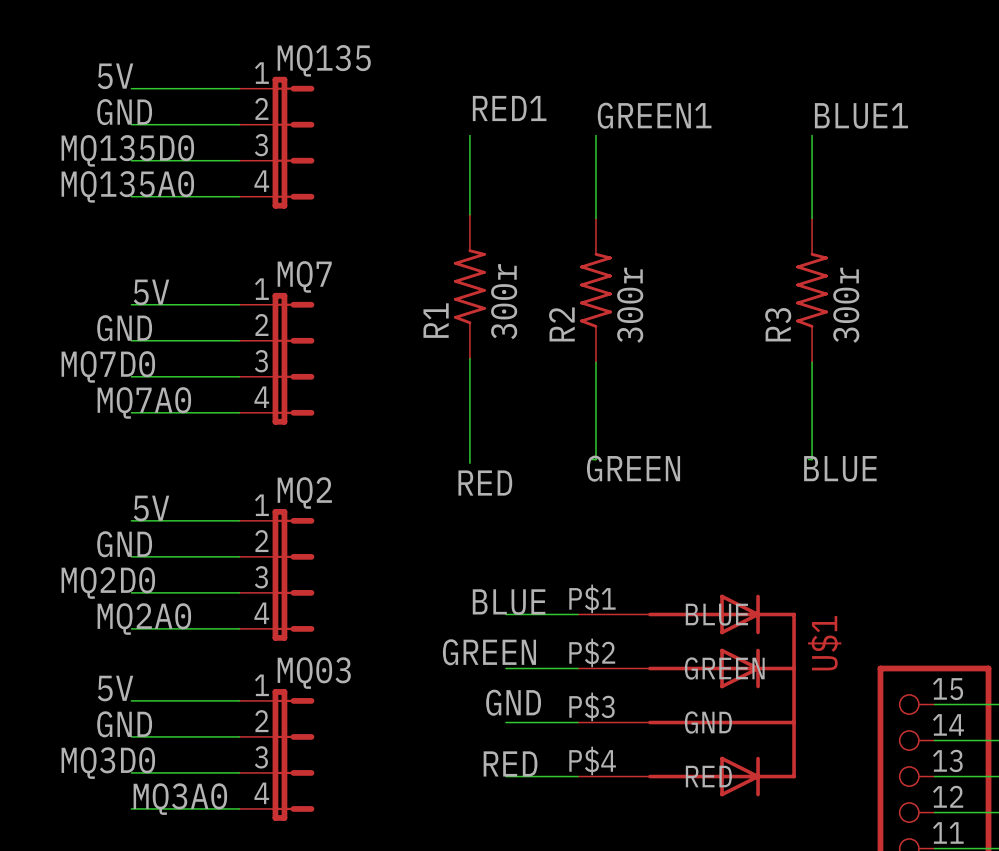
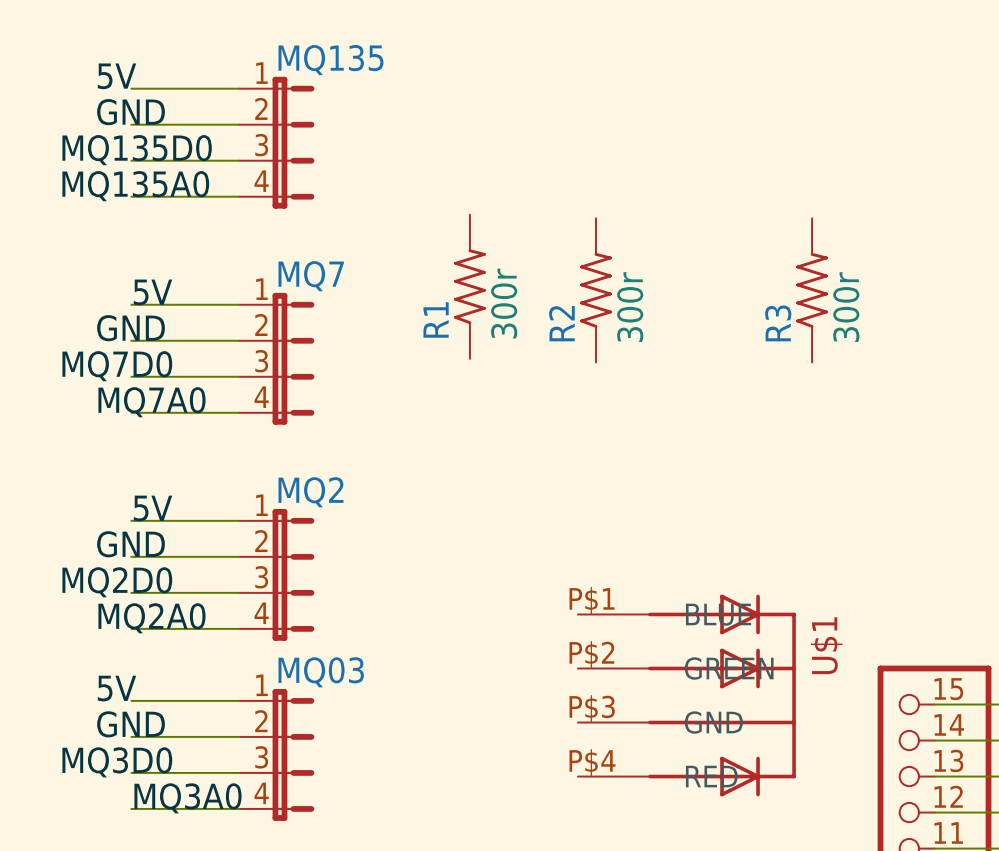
label: RED1 (509, 108) -> none
label: GREEN1 (654, 115) -> none
label: BLUE1 (861, 115) -> none
wire: (469, 135) (469, 214) -> none
wire: (595, 135) (595, 218) -> none
wire: (812, 135) (812, 218) -> none
wire: (469, 358) (469, 463) -> none
wire: (595, 362) (595, 459) (592, 459) -> none
wire: (812, 362) (812, 459) (808, 459) -> none
label: GREEN (633, 468) -> none
label: BLUE (840, 468) -> none
label: RED (485, 483) -> none
label: BLUE (509, 602) -> none
wire: (505, 614) (577, 614) -> none
label: GREEN (489, 652) -> none
wire: (505, 668) (577, 668) -> none
label: GND (513, 702) -> none
wire: (505, 722) (577, 722) -> none
label: RED (510, 763) -> none
wire: (505, 776) (577, 776) -> none

